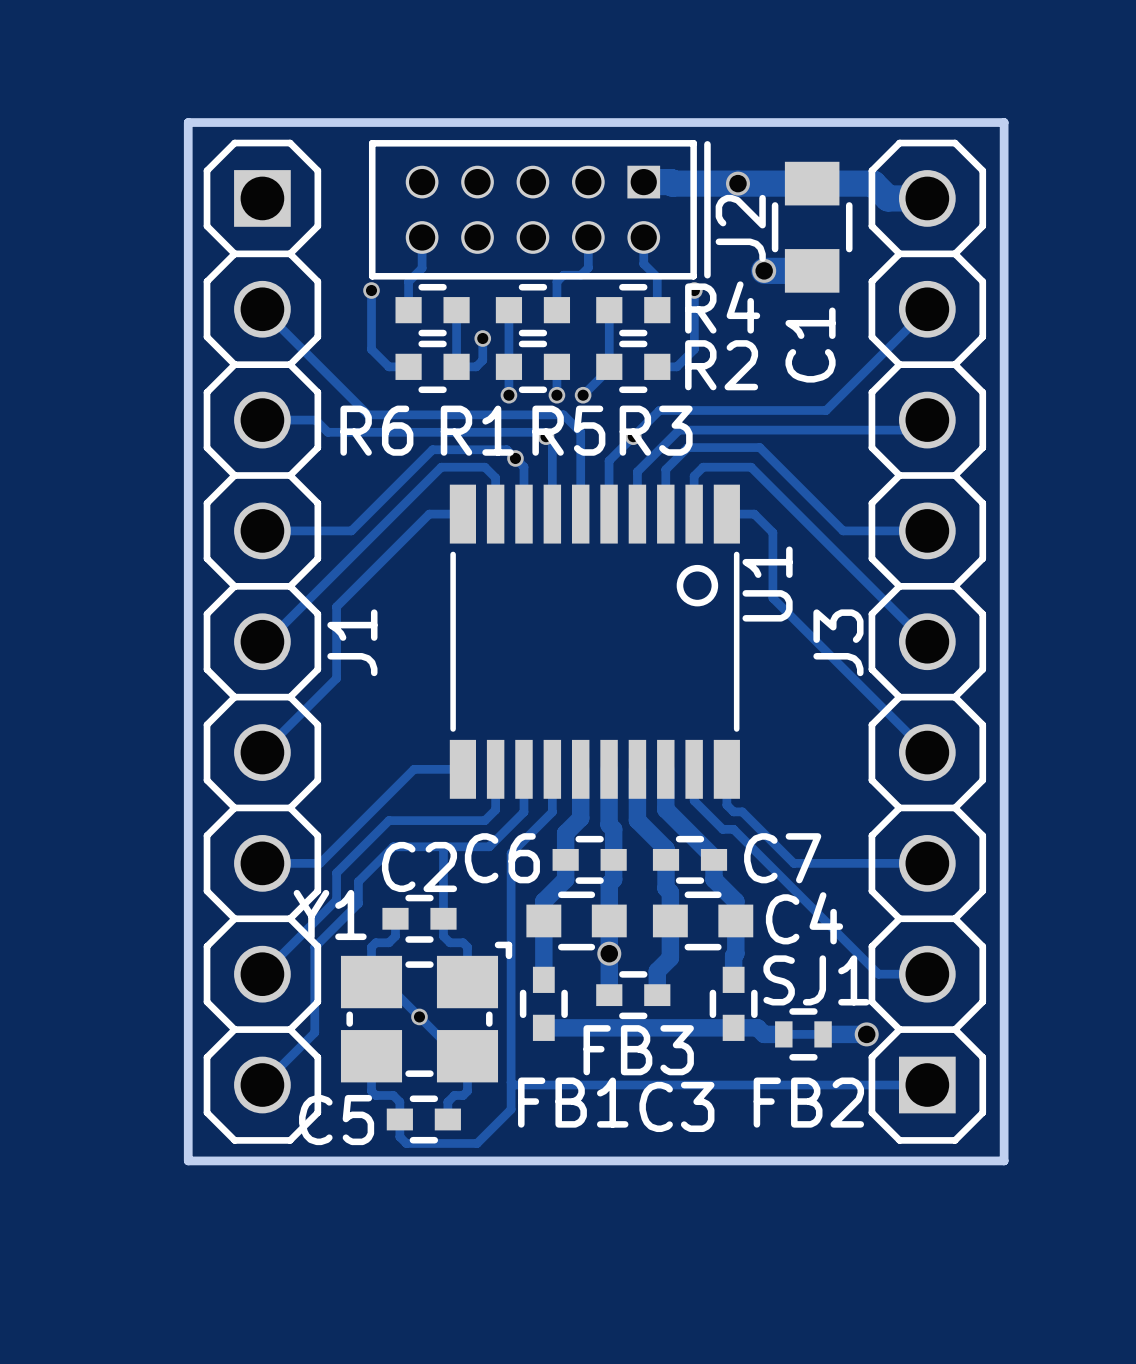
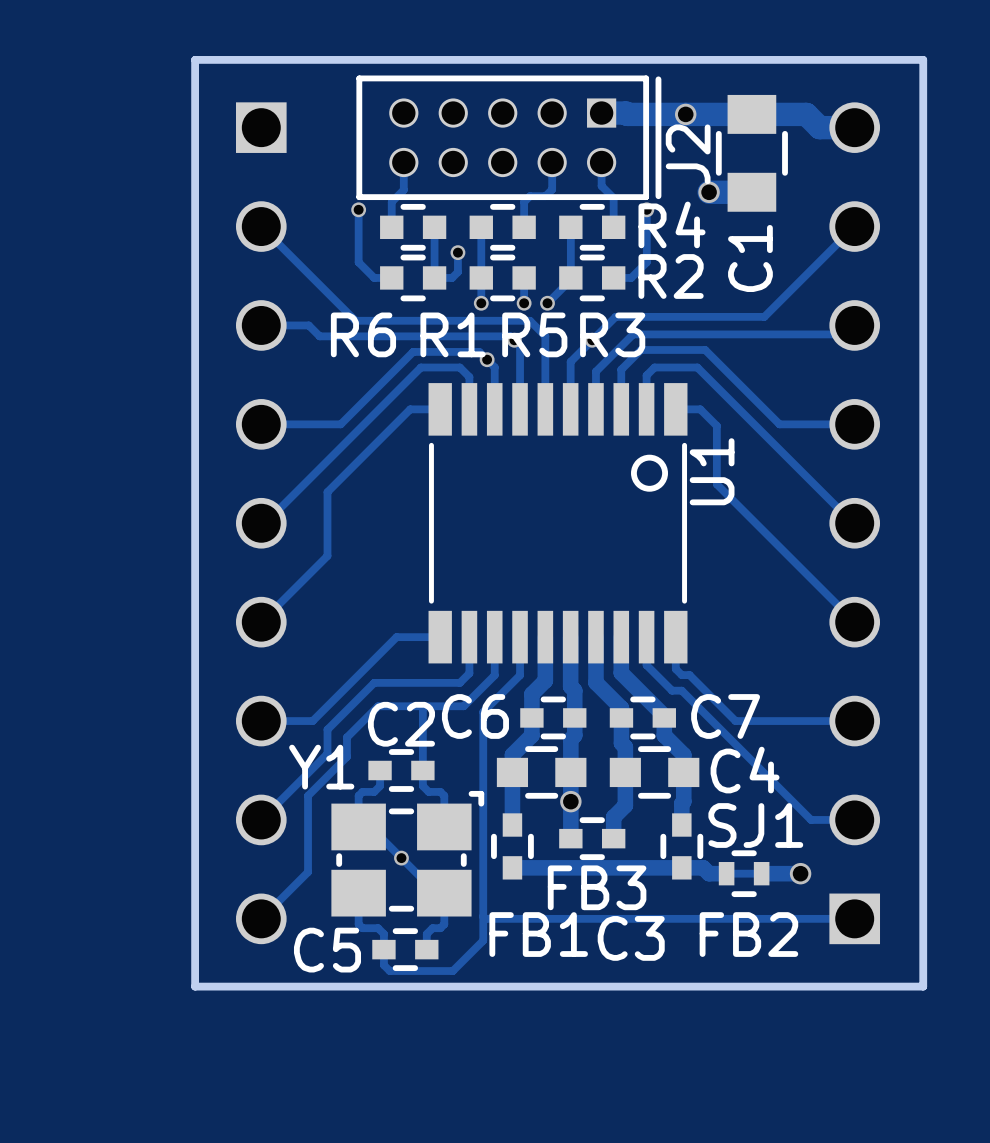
J1 side: top (262, 641) -> bottom (261, 523)
J3 side: top (927, 641) -> bottom (854, 523)

